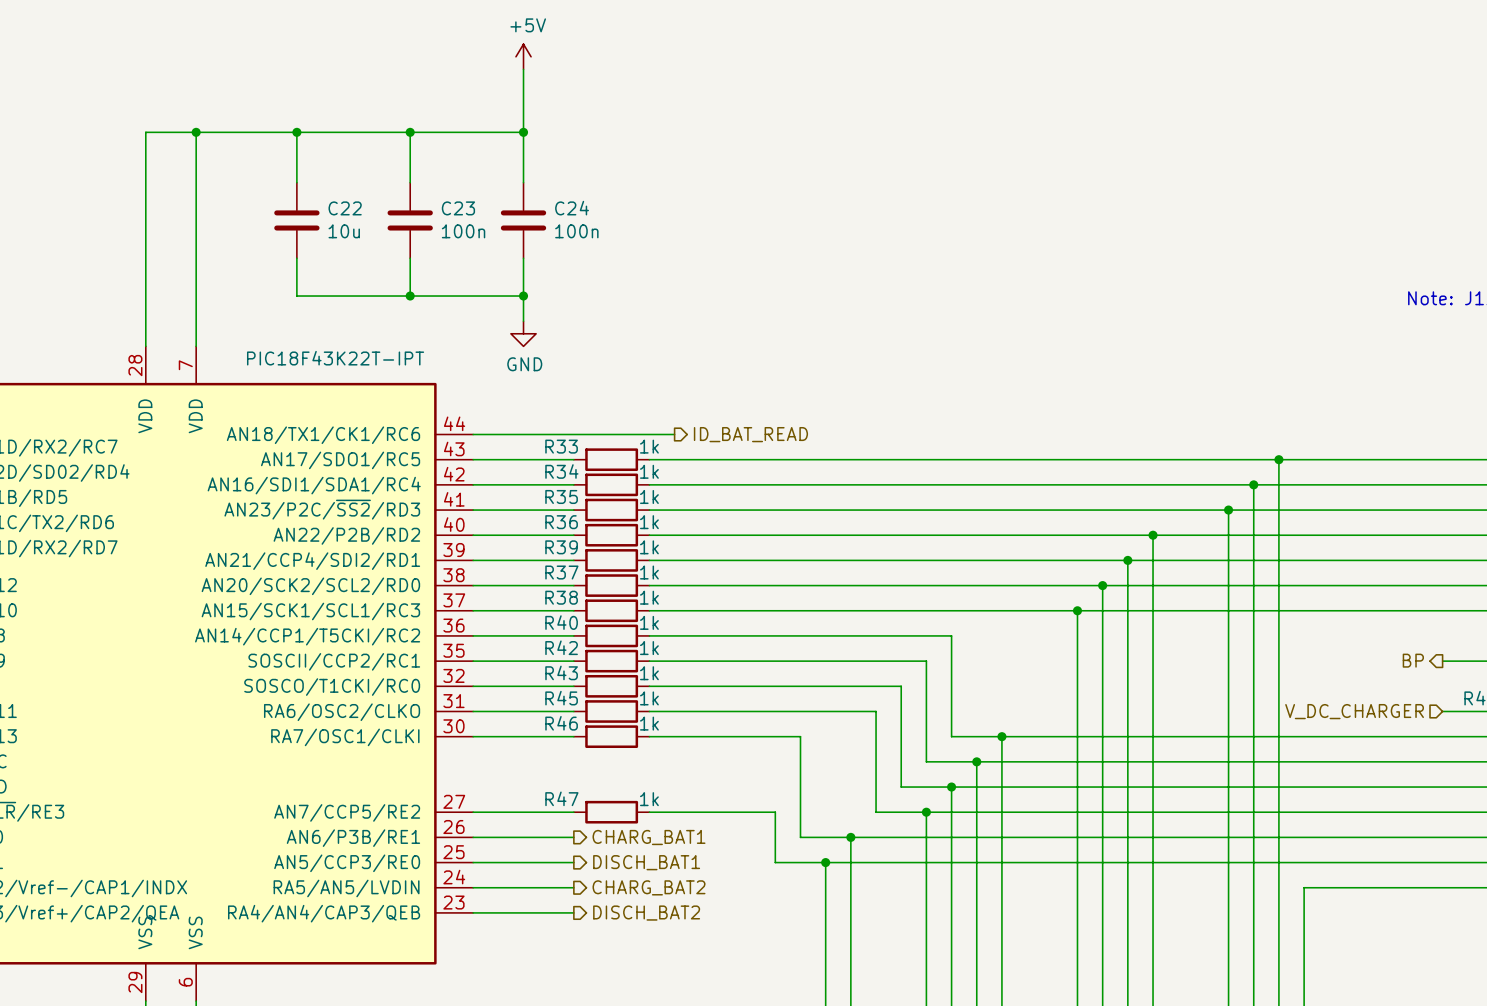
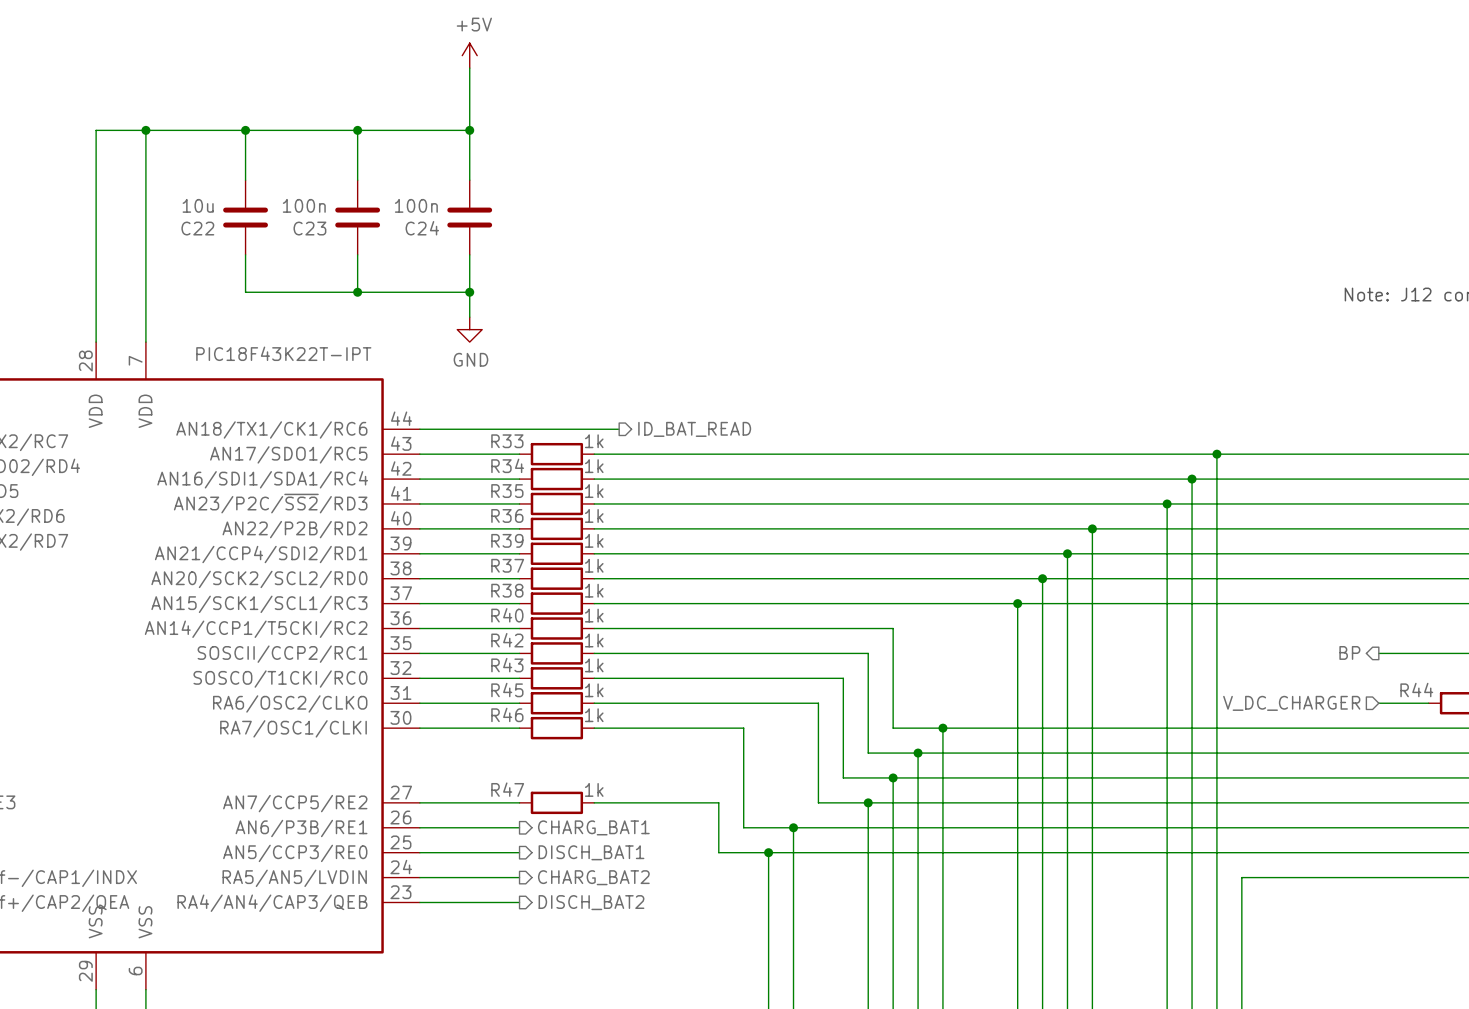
C22 name position: C22 (345, 208) -> C22 (197, 228)
C23 name position: C23 (458, 208) -> C23 (309, 228)
C24 name position: C24 (572, 208) -> C24 (422, 228)
C22 value position: 10u (344, 231) -> 10u (198, 205)
C23 value position: 100n (463, 231) -> 100n (304, 205)
C24 value position: 100n (576, 231) -> 100n (416, 205)

